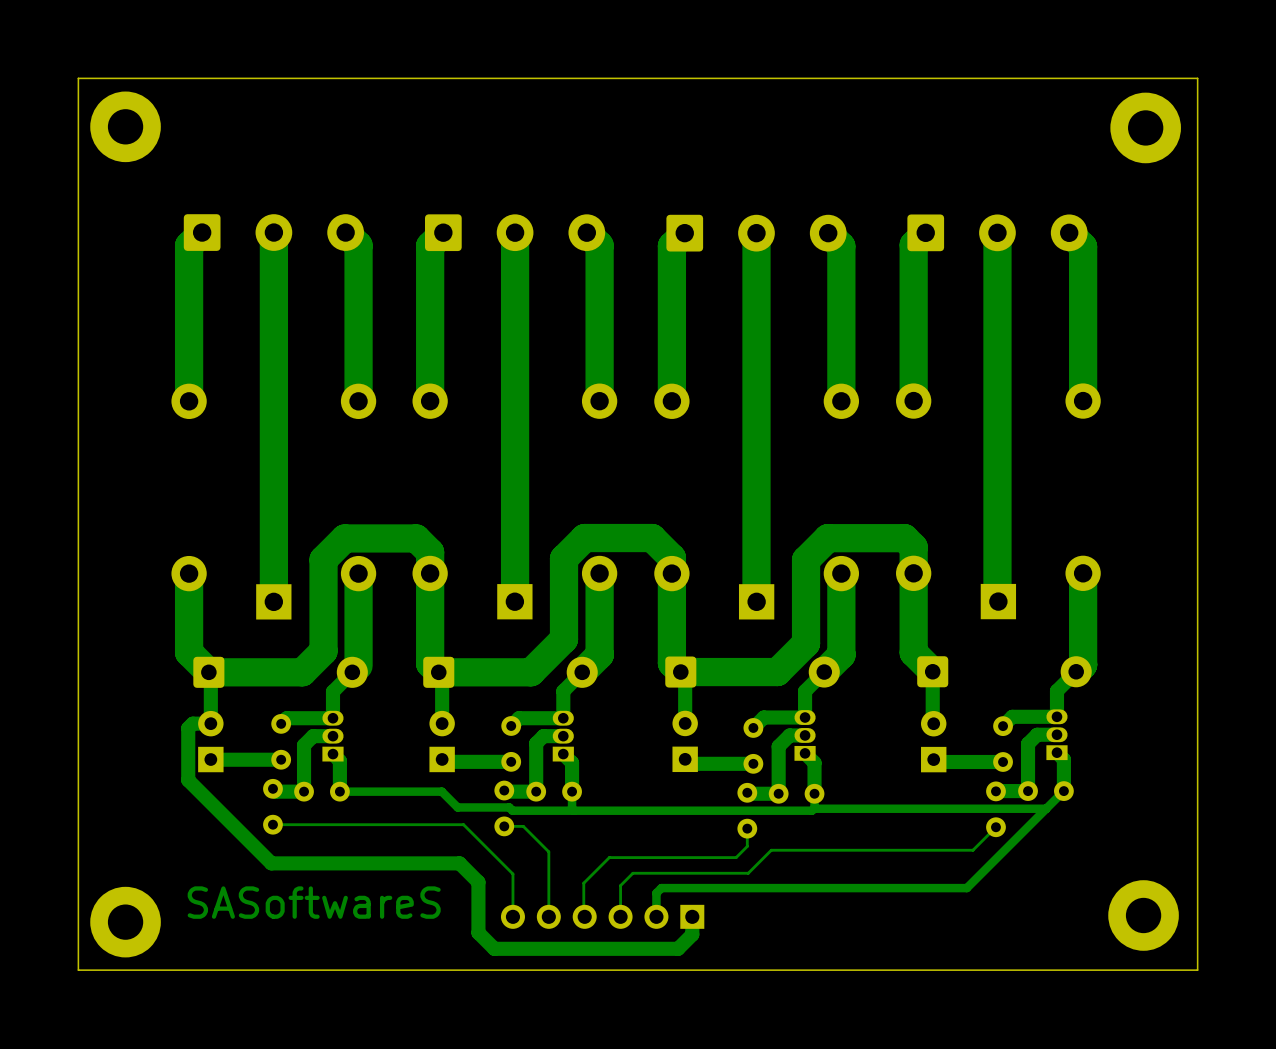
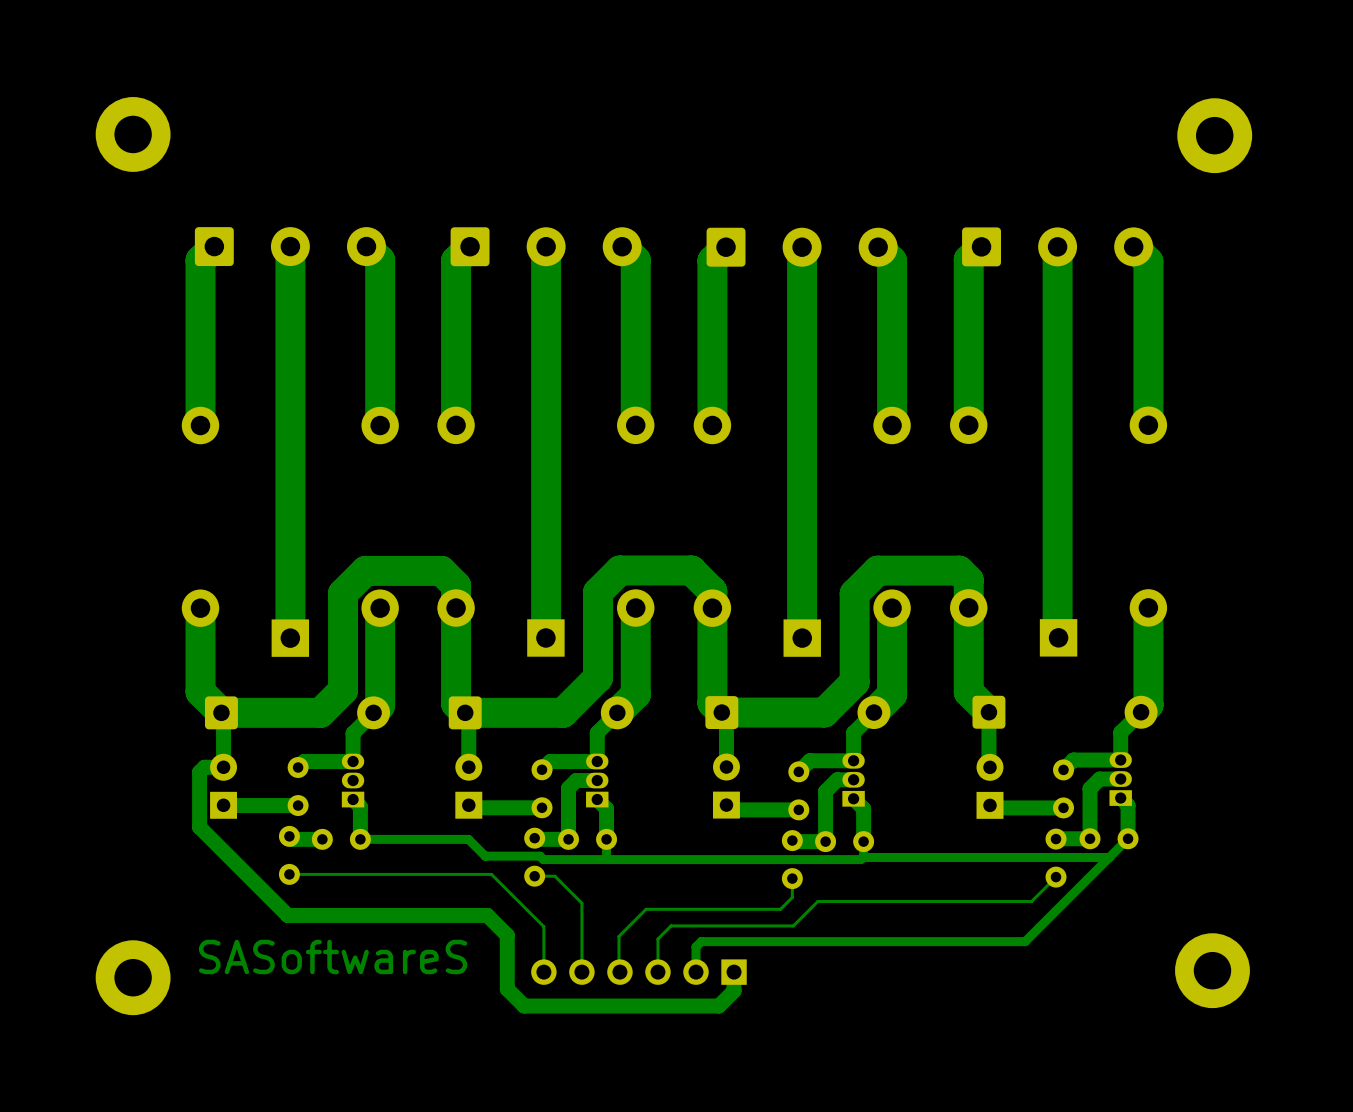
board edge: (1197, 78) (78, 78) (78, 970) (1197, 970) (1197, 78) -> none
bottom track: (332, 736) (313, 736) (304, 745) (304, 791) -> none

